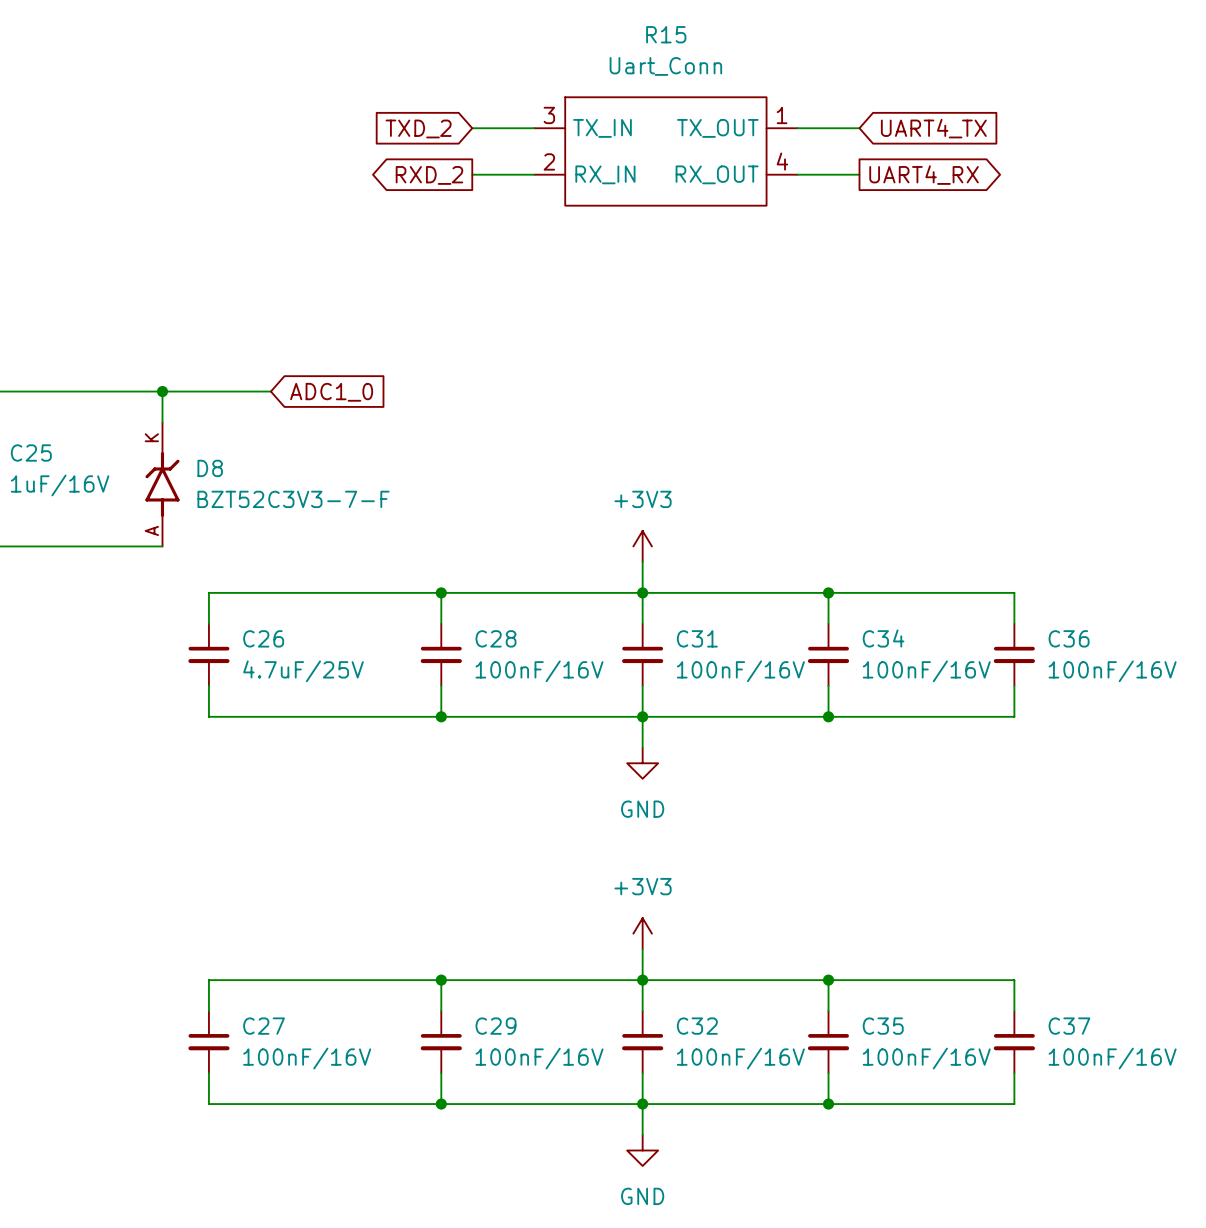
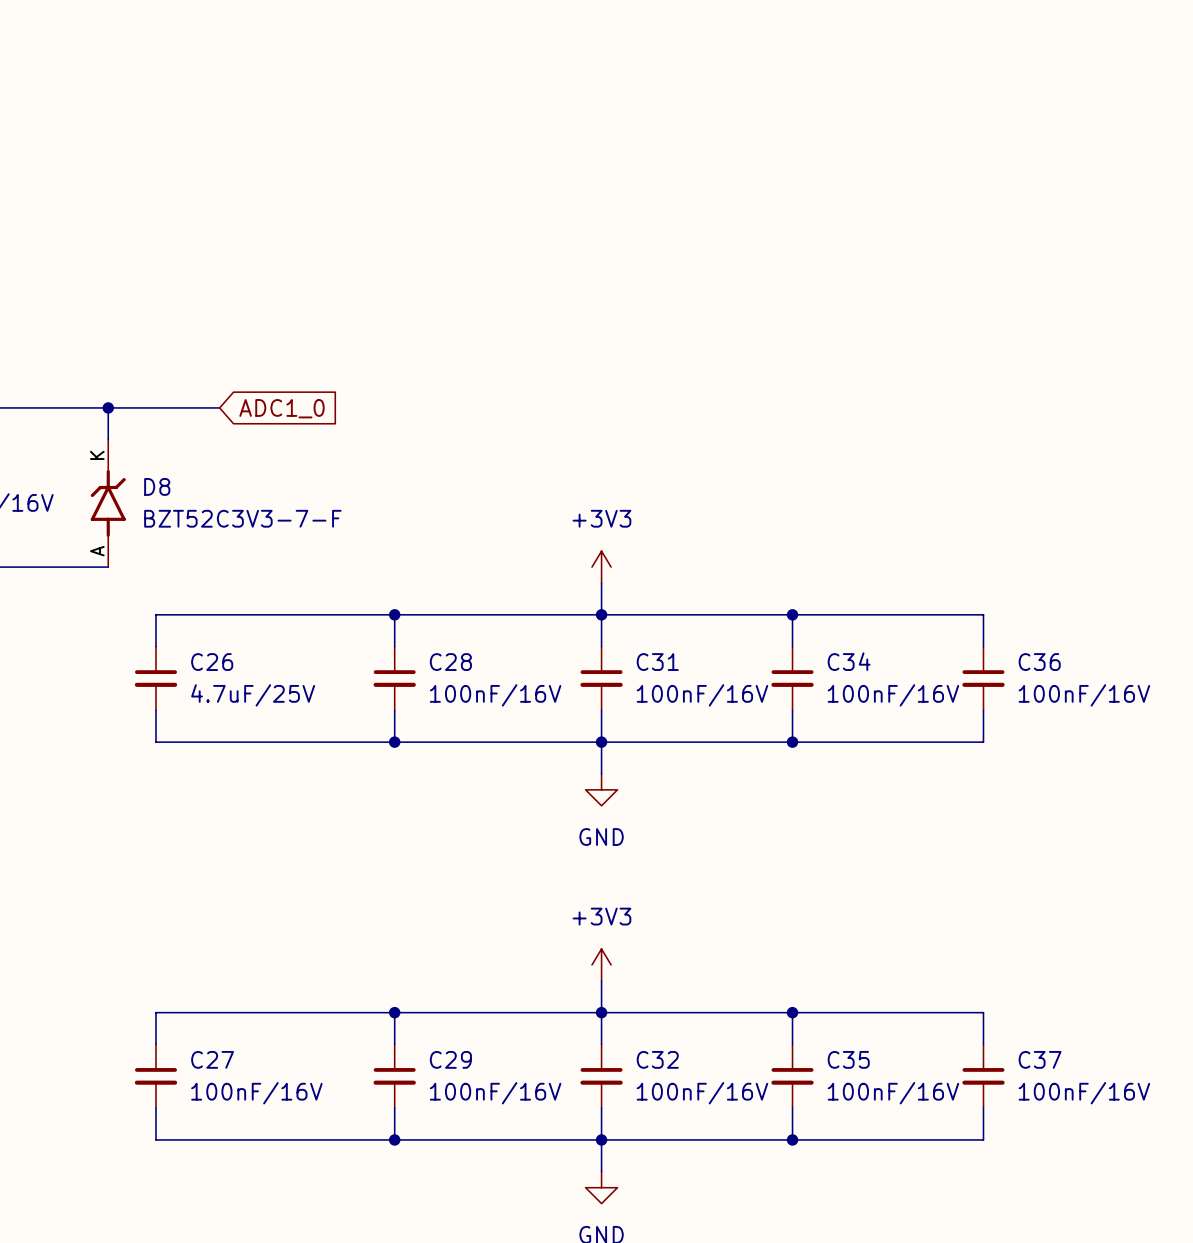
global label: TXD_2 (418, 128) -> none
wire: (472, 128) (534, 128) -> none
wire: (797, 128) (859, 128) -> none
global label: UART4_TX (933, 128) -> none
R15: Uart_Conn (665, 151) -> none
wire: (472, 174) (534, 174) -> none
wire: (797, 174) (859, 174) -> none
global label: RXD_2 (429, 175) -> none
global label: UART4_RX (924, 175) -> none

